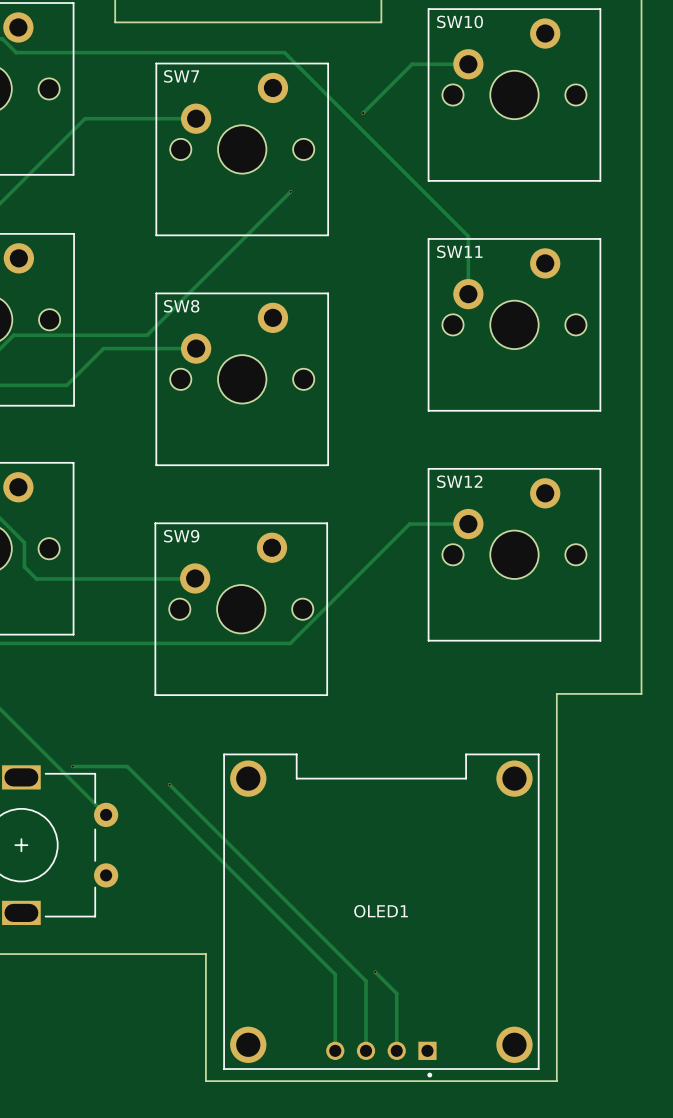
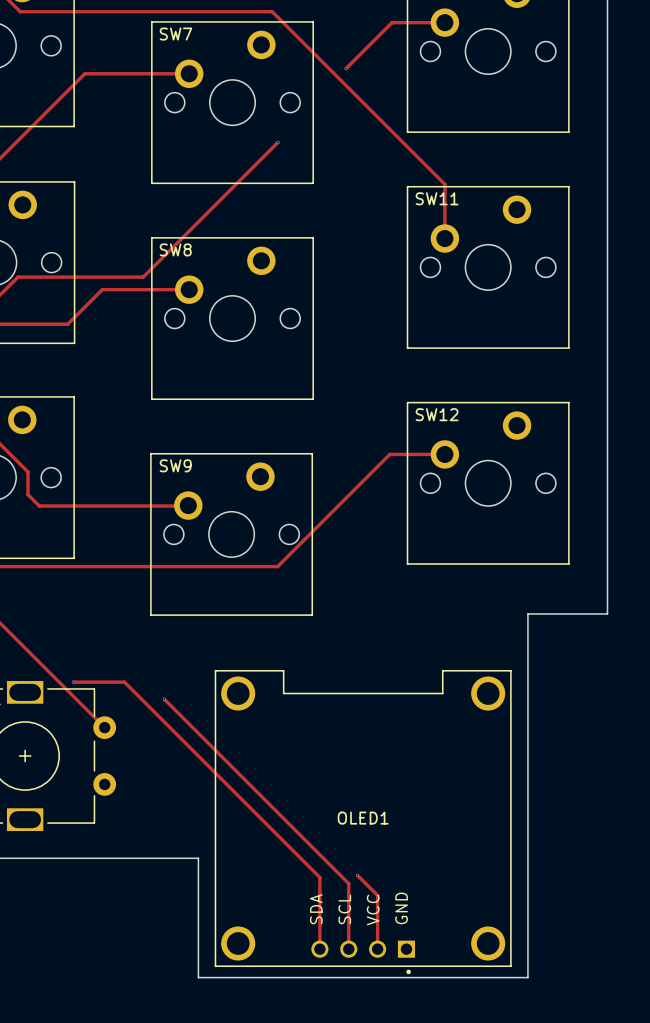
text: none -> GND (401, 908)
text: none -> SDA (316, 909)
text: none -> VCC (373, 910)
text: none -> SCL (344, 909)

